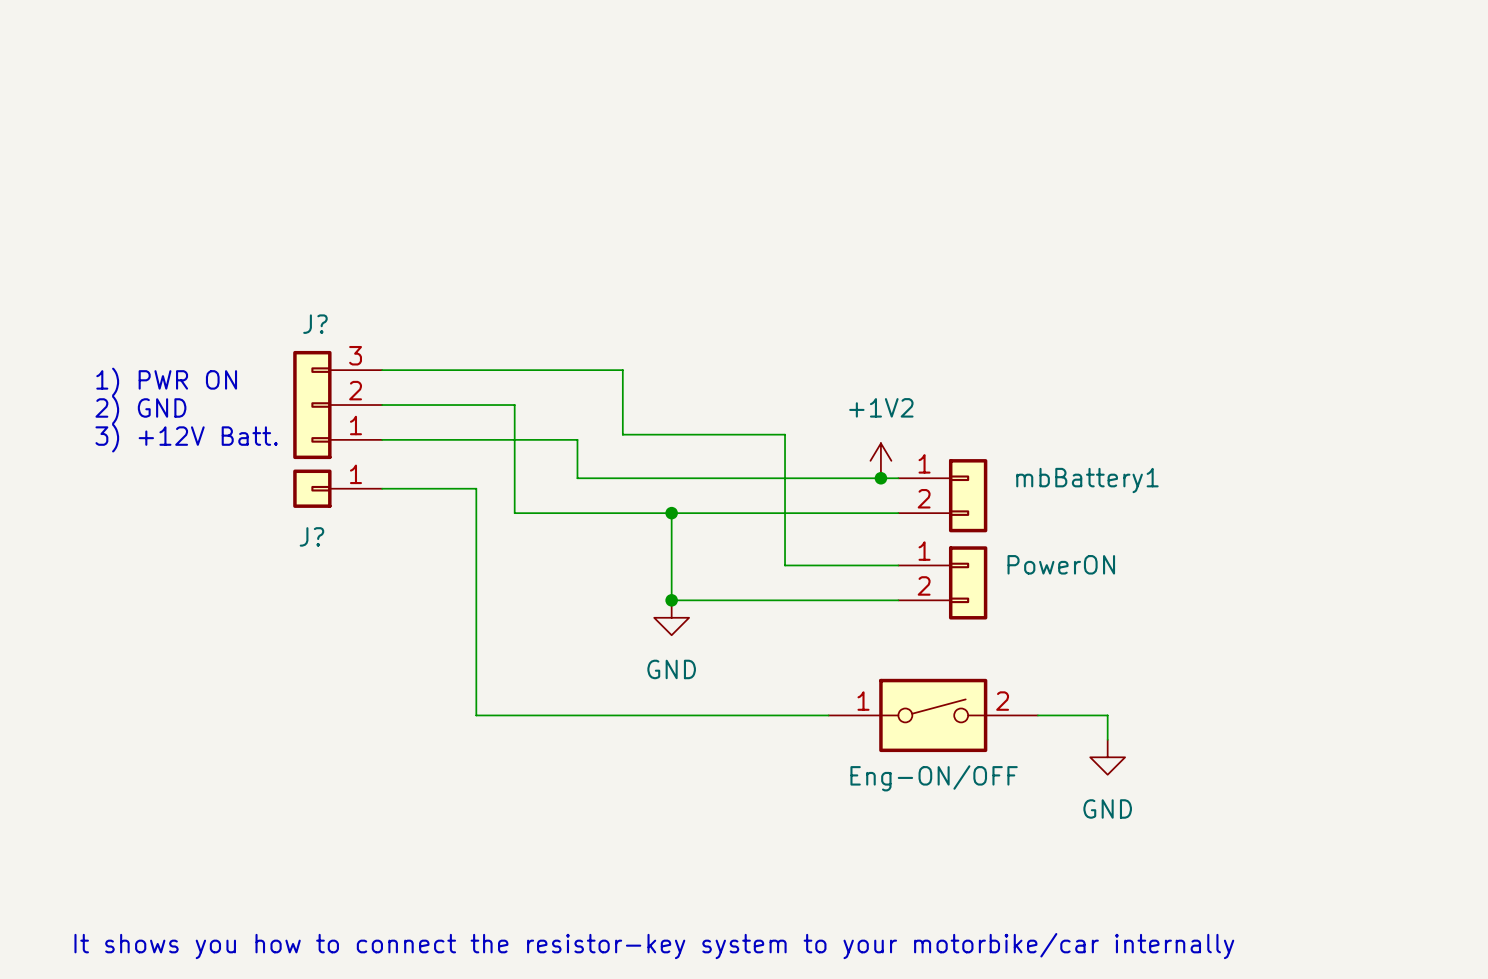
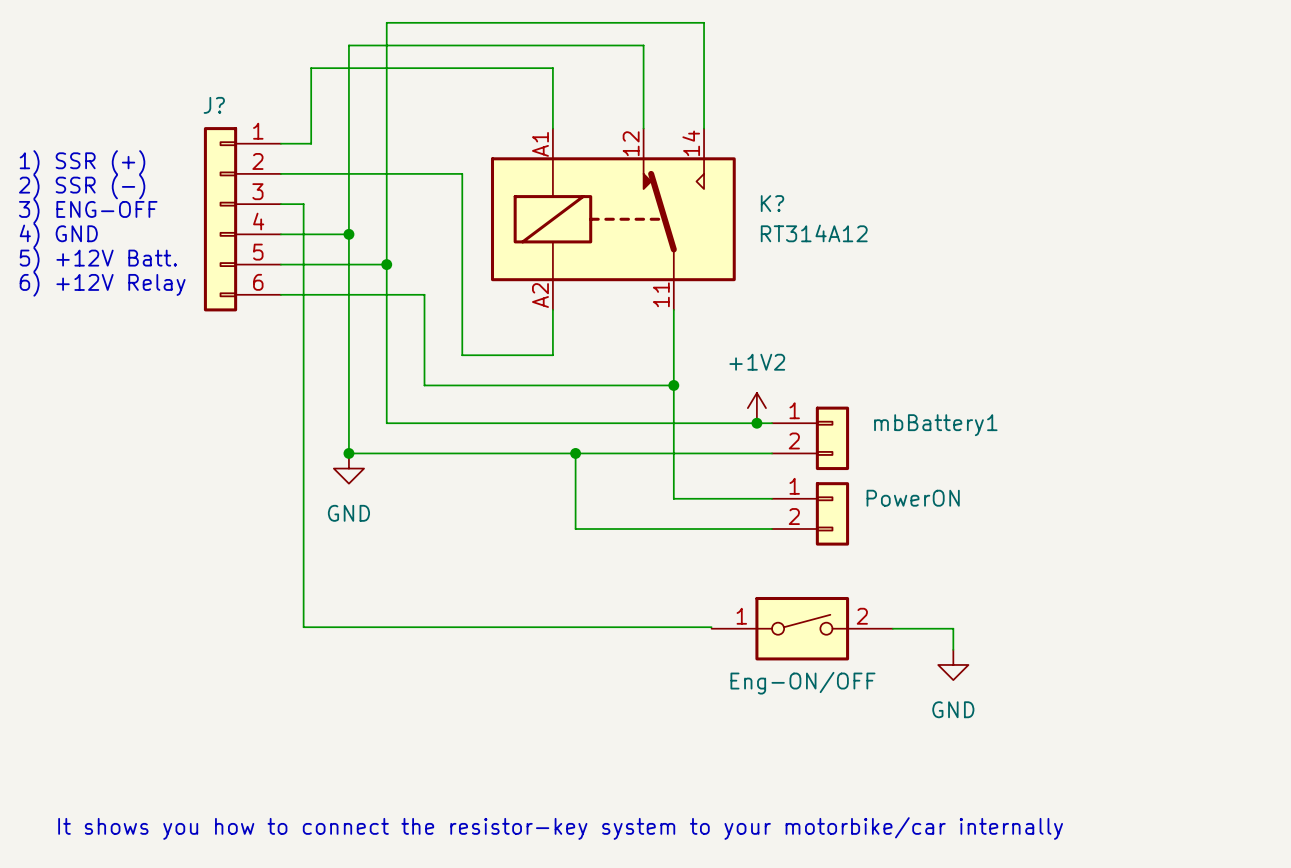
wire: none -> (552, 128) (552, 68) (311, 68) (311, 143) (280, 143)
text: none -> 1) SSR (+) (82, 162)
wire: none -> (280, 173) (462, 173) (462, 355) (552, 355) (552, 309)
text: none -> 2) SSR (-) (82, 186)
wire: none -> (280, 204) (303, 204) (303, 627) (711, 627)
text: none -> 3) ENG-OFF (88, 211)
J?: none -> (242, 219)
K?: none -> RT314A12 (613, 219)
wire: none -> (280, 234) (348, 234)
junction: none -> (348, 234)
text: none -> 4) GND (58, 235)
text: none -> 5) +12V Batt. (98, 259)
wire: none -> (280, 264) (386, 264)
junction: none -> (386, 264)
text: none -> 6) +12V Relay (102, 284)
wire: none -> (673, 309) (673, 385)
wire: (382, 370) (622, 370) (622, 434) -> (280, 294) (424, 294) (424, 385) (533, 385)
text: 1) PWR ON (166, 381) -> none
J?: (337, 405) -> none
wire: (382, 405) (514, 405) (514, 513) -> (643, 128) (643, 45) (348, 45) (348, 453) (439, 453)
text: 2) GND (140, 410) -> none
junction: none -> (673, 385)
text: 3) +12V Batt. (186, 438) -> none
wire: (382, 439) (577, 439) (577, 478) -> (704, 128) (704, 22) (386, 22) (386, 423) (494, 423)
J?: (337, 488) -> none
wire: (382, 488) (476, 488) (476, 715) (828, 715) -> none
junction: none -> (348, 453)
junction: (671, 600) -> none
power symbol position: GND (671, 617) -> GND (348, 468)

